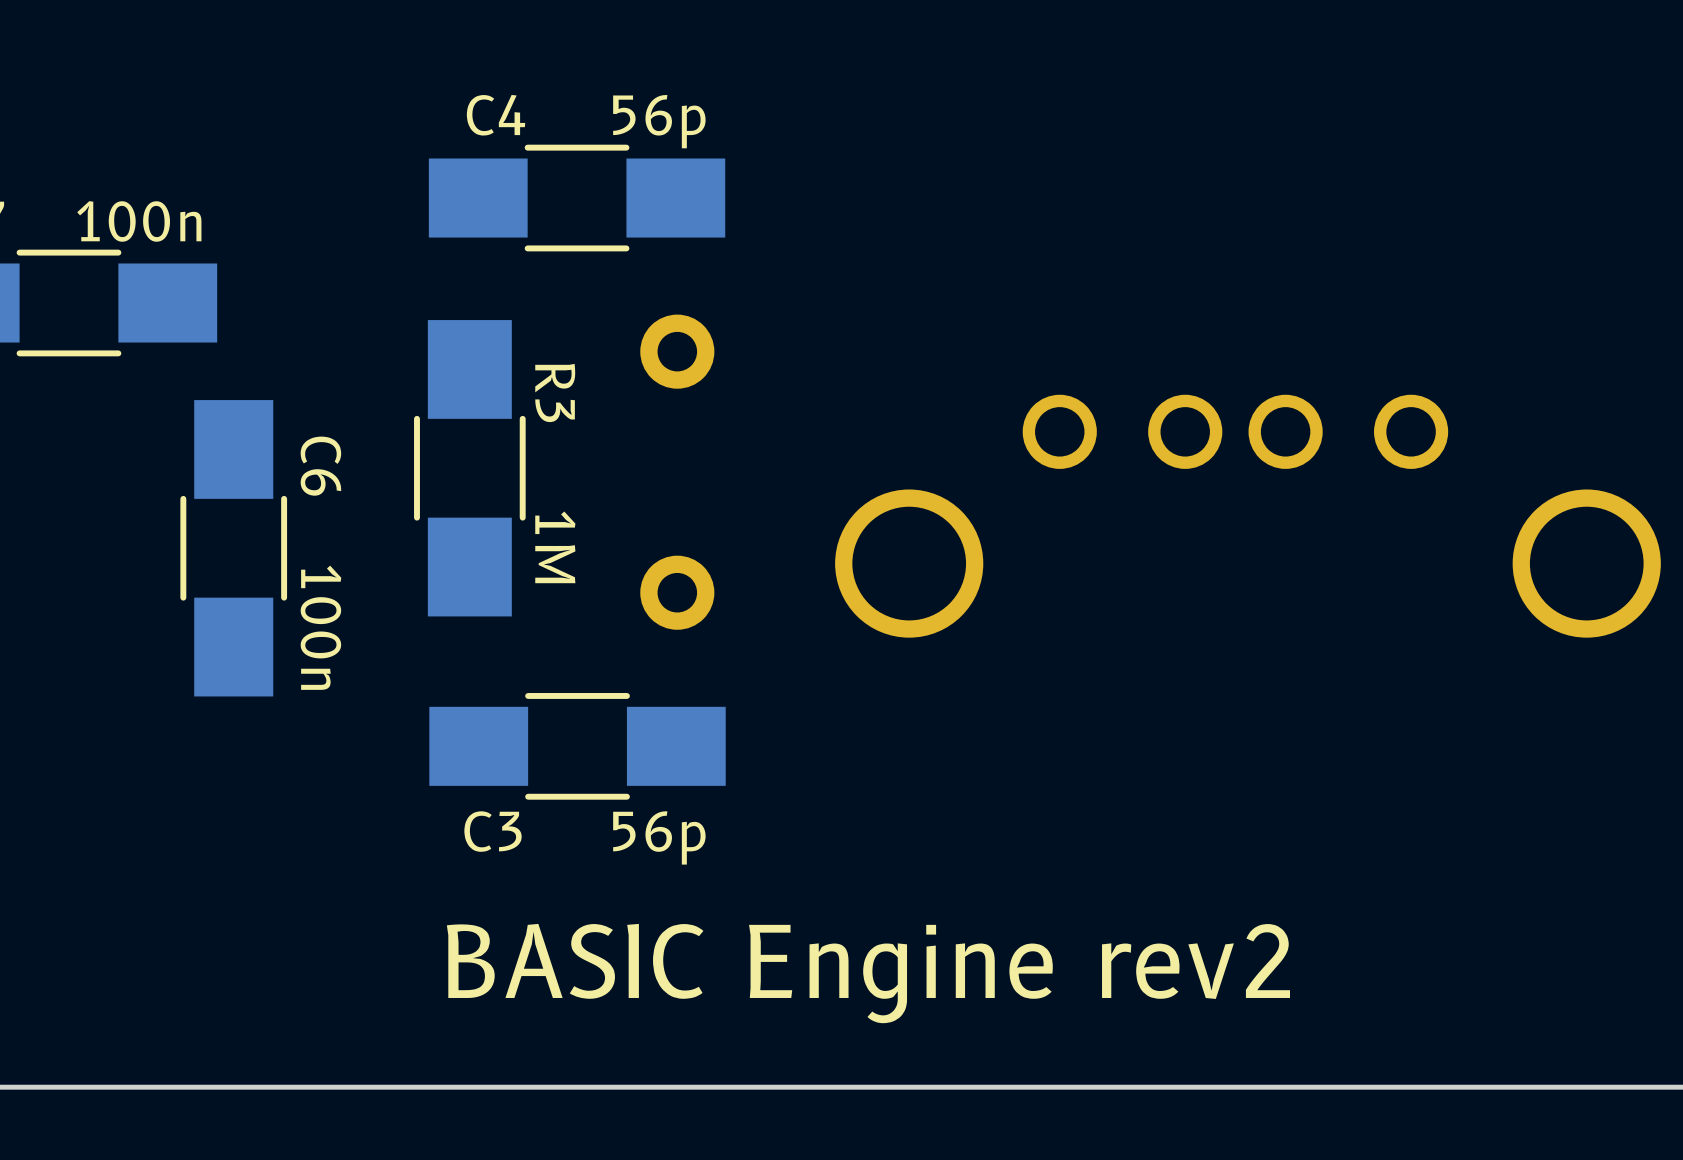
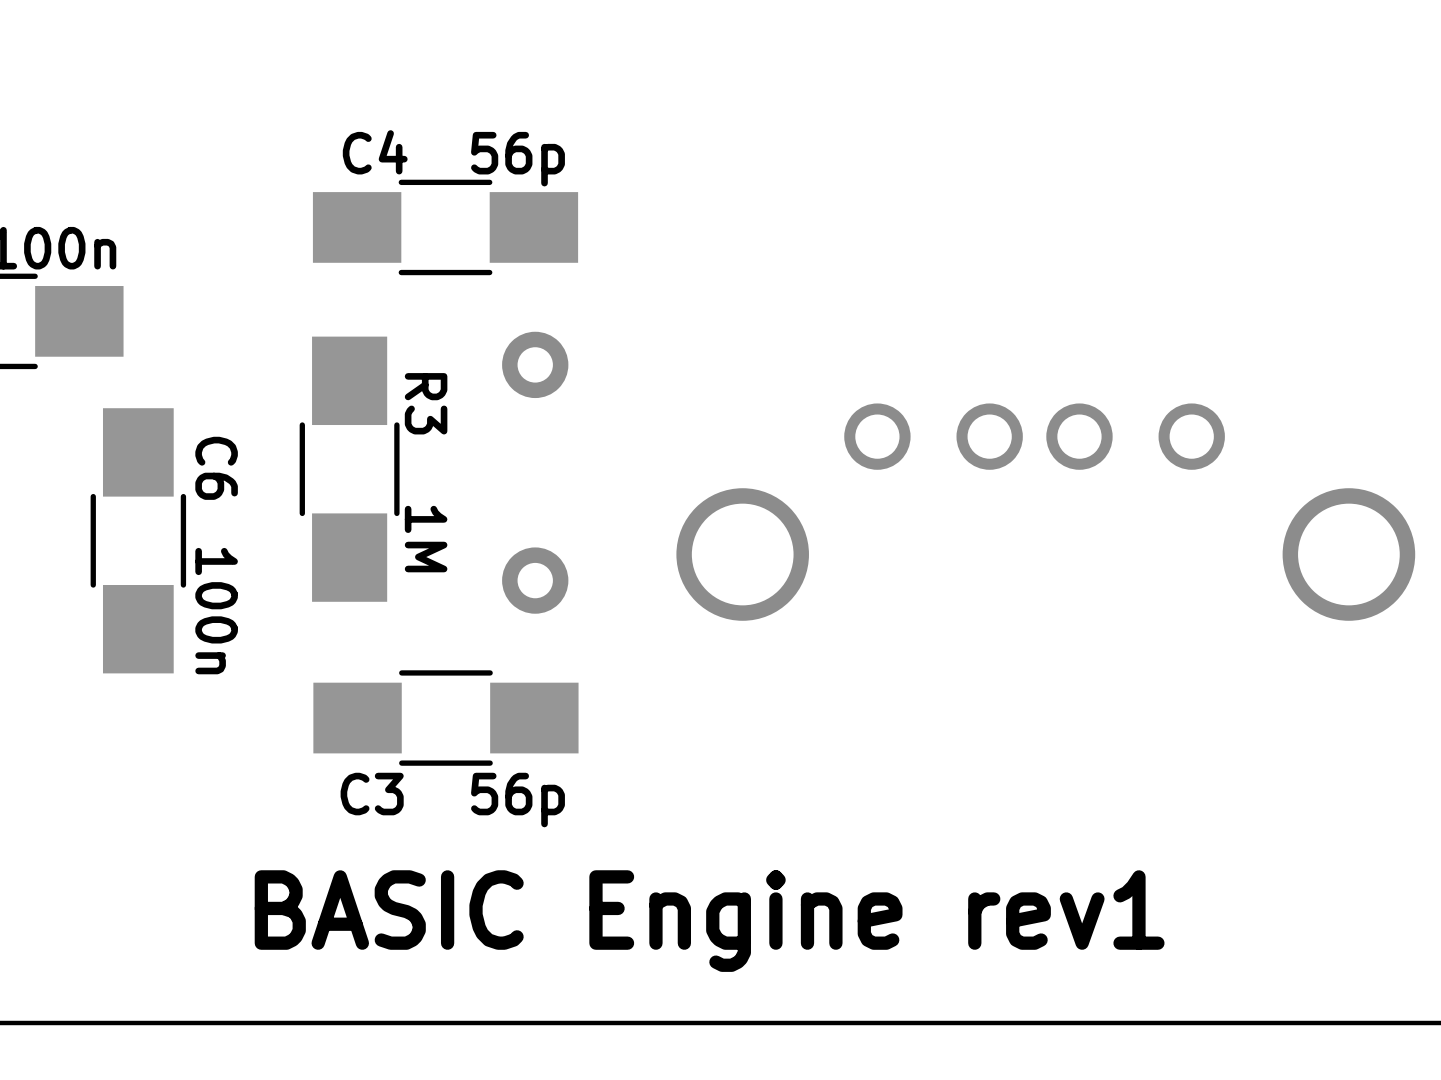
text: BASIC Engine rev2 (868, 973) -> BASIC Engine rev1 (709, 921)

